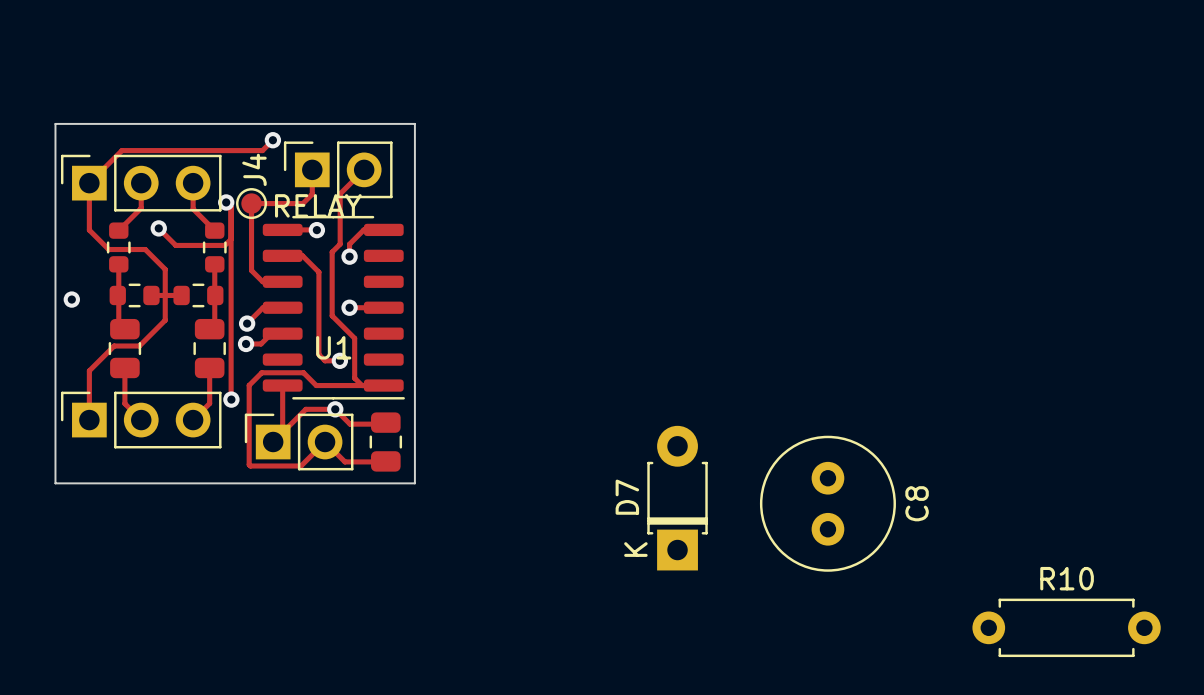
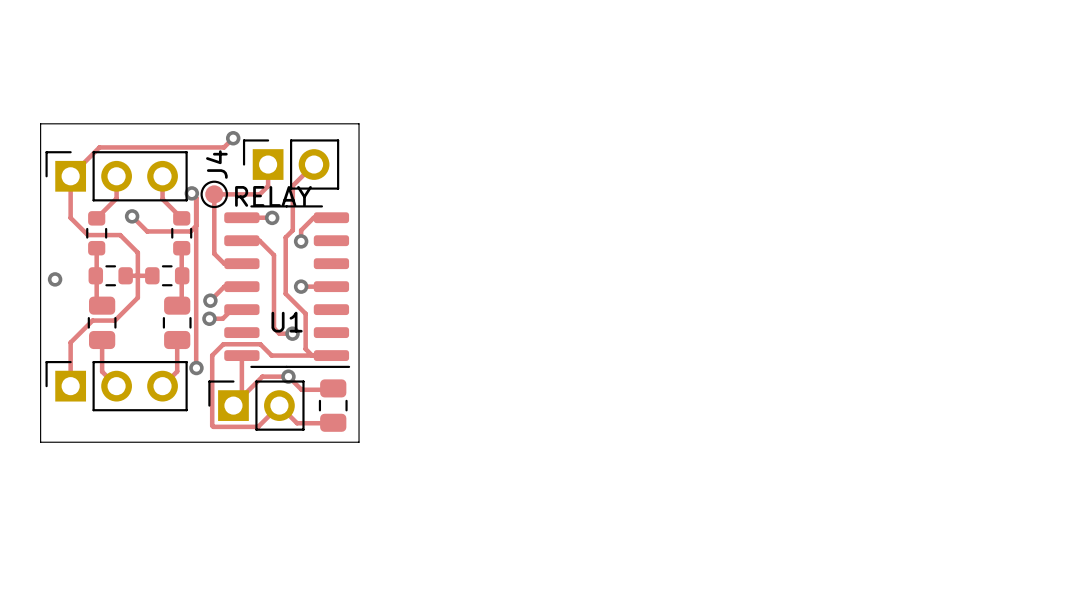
D7: (677, 498) -> none
C8: (827, 503) -> none
R10: (1066, 627) -> none

